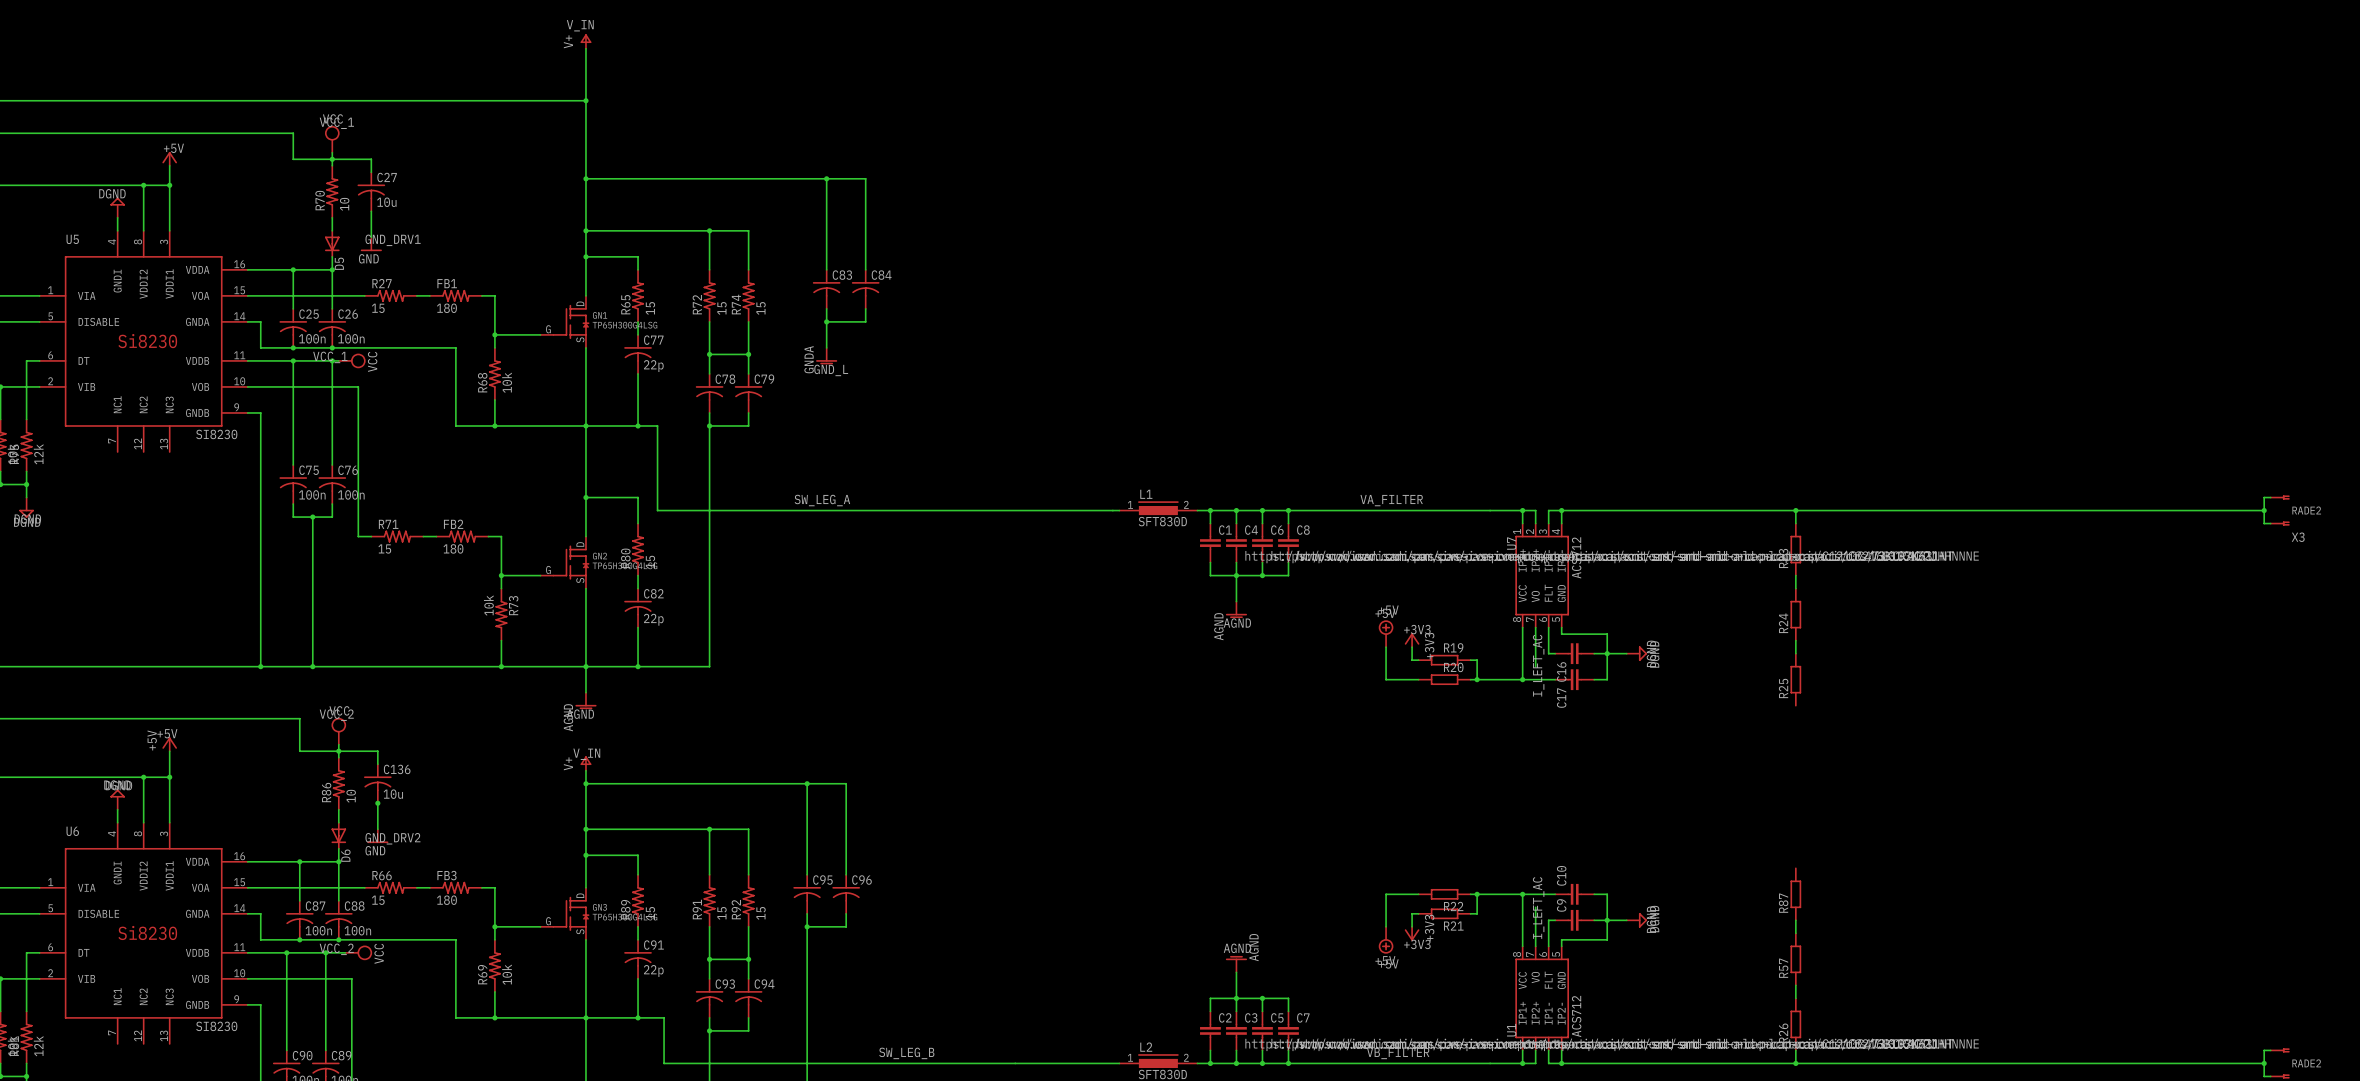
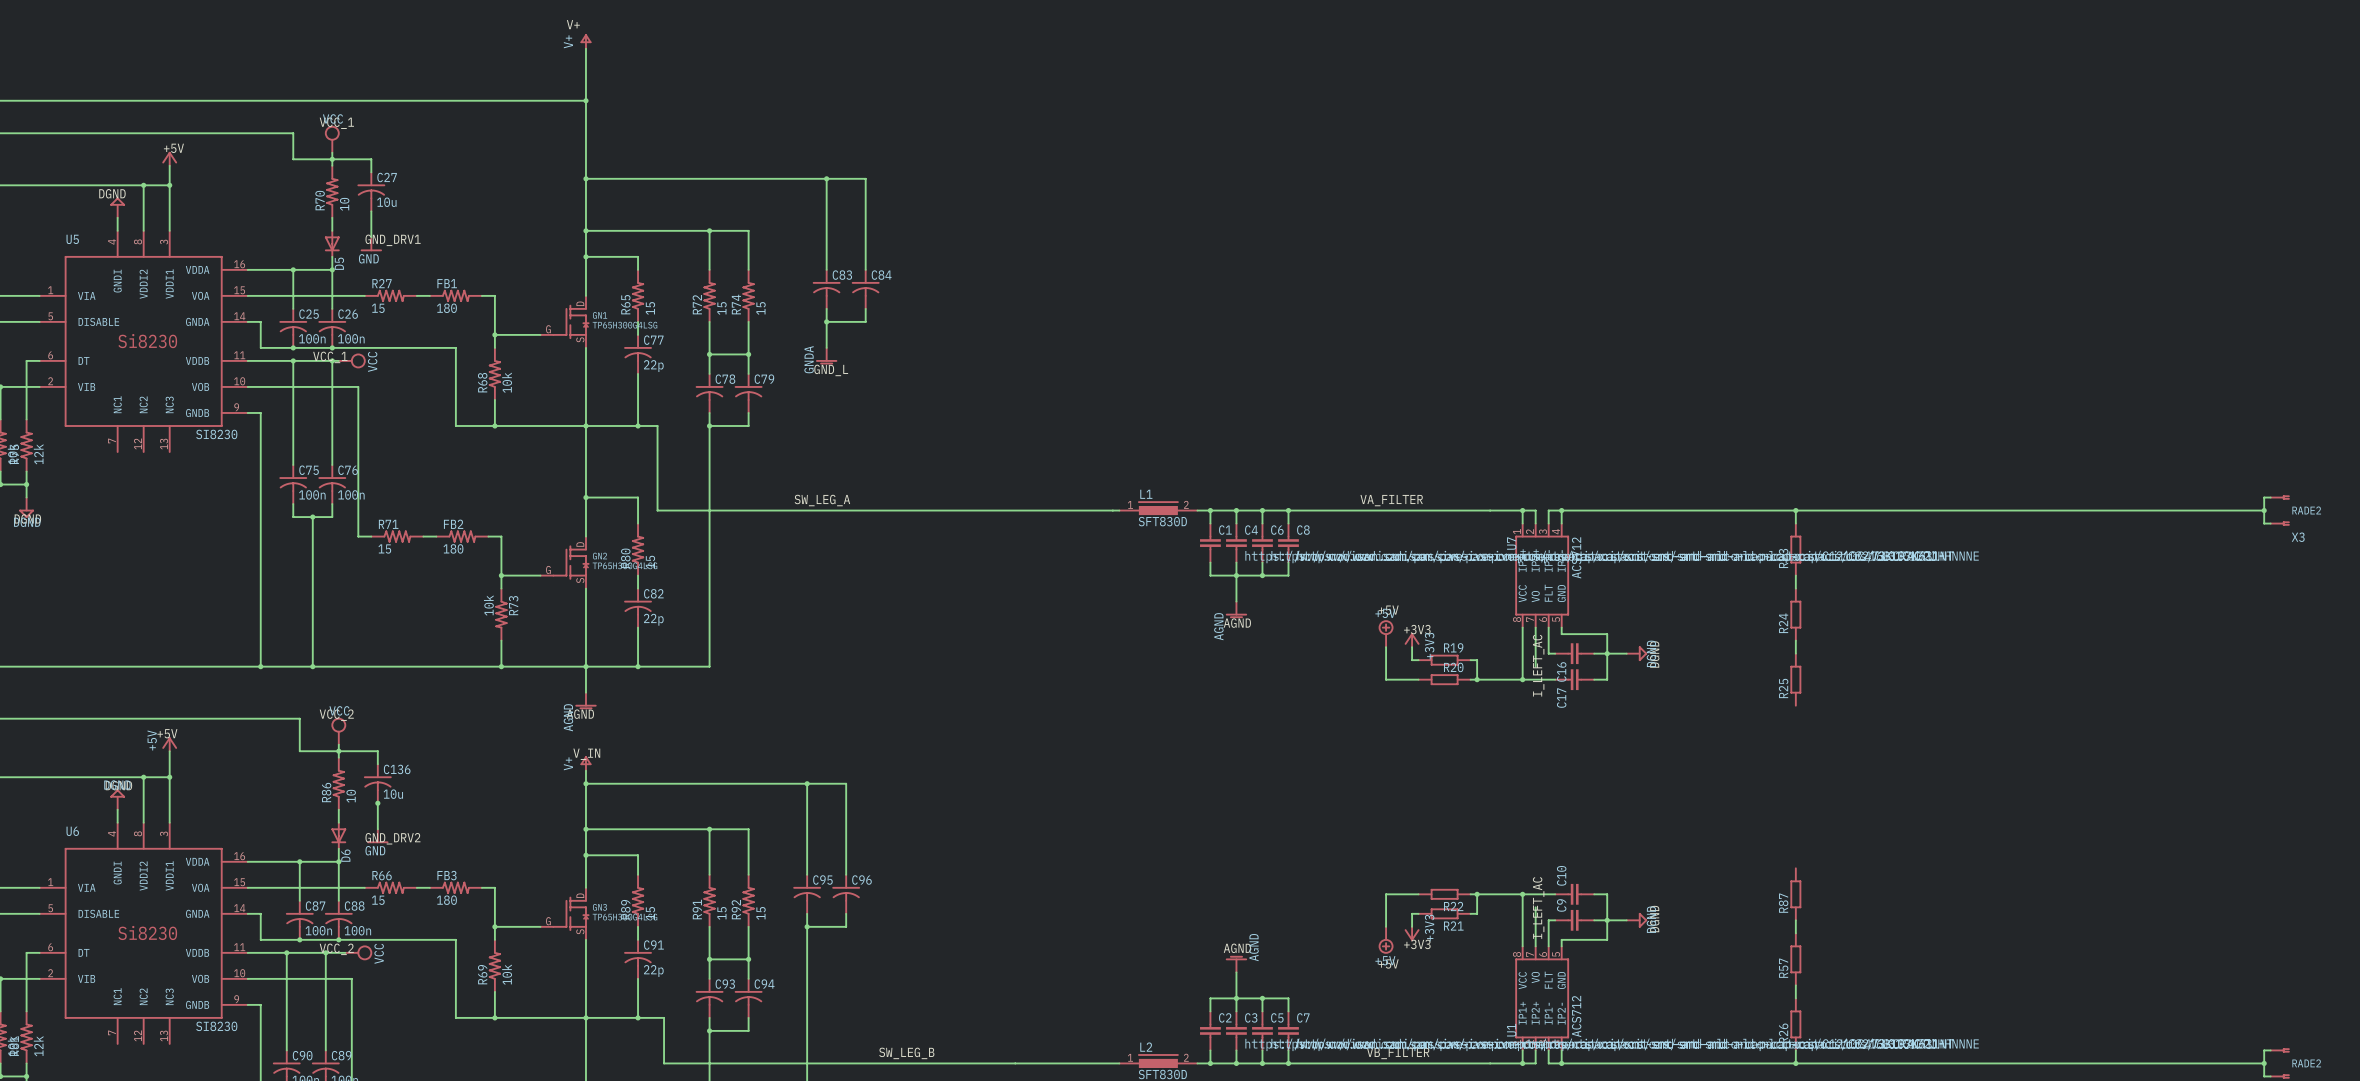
label: V_IN (580, 25) -> V+ (573, 24)

